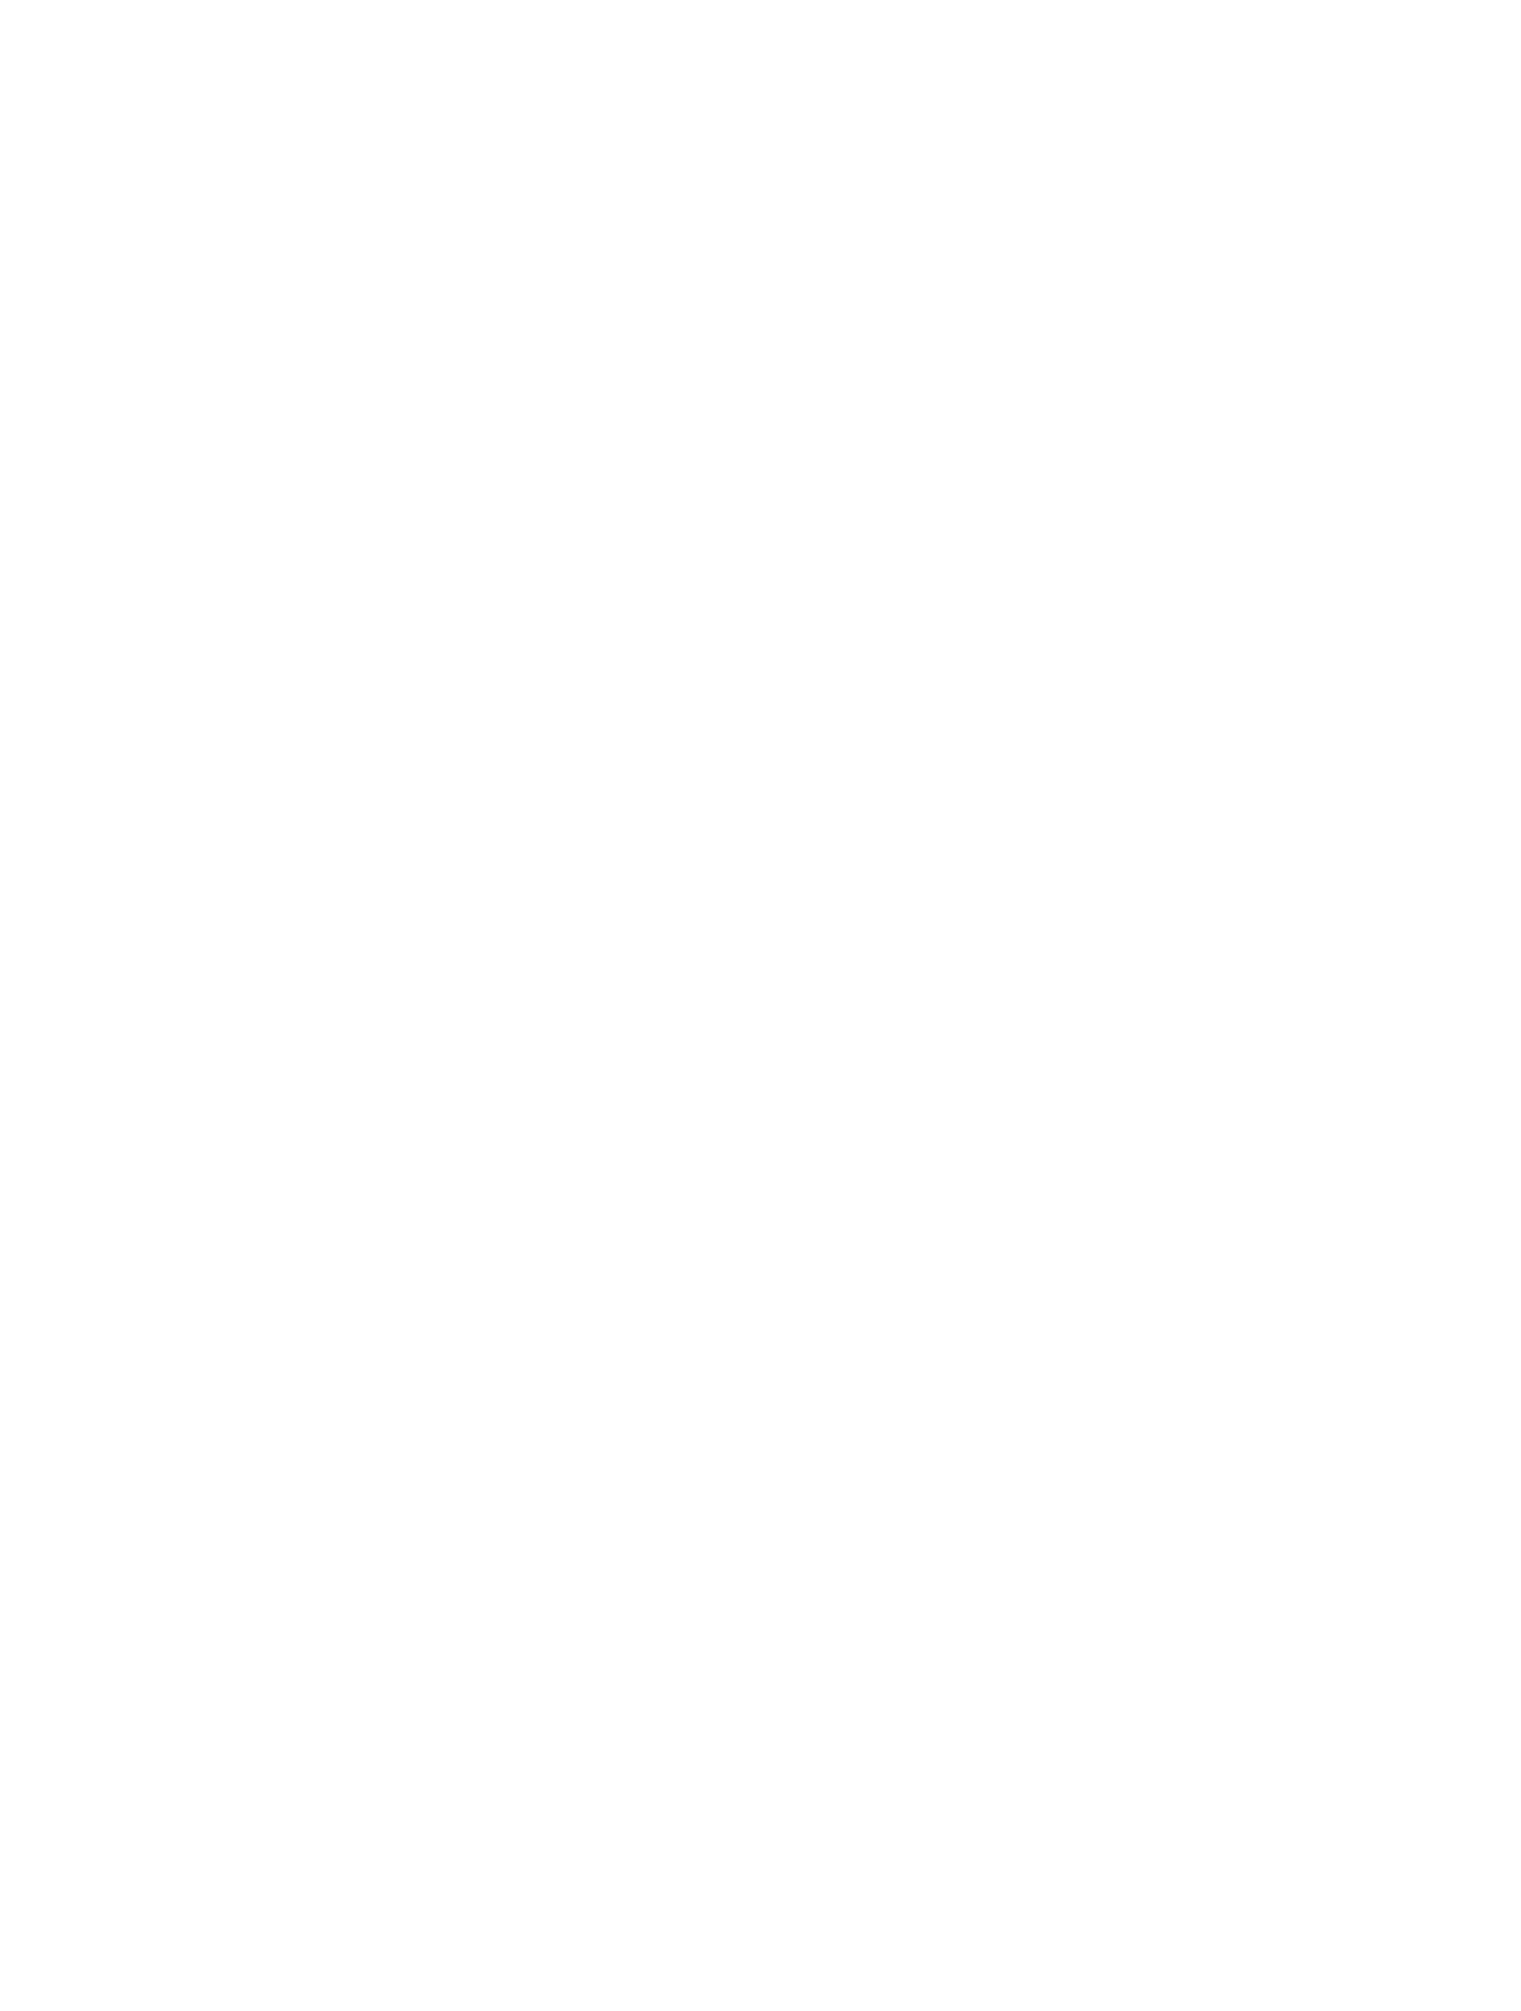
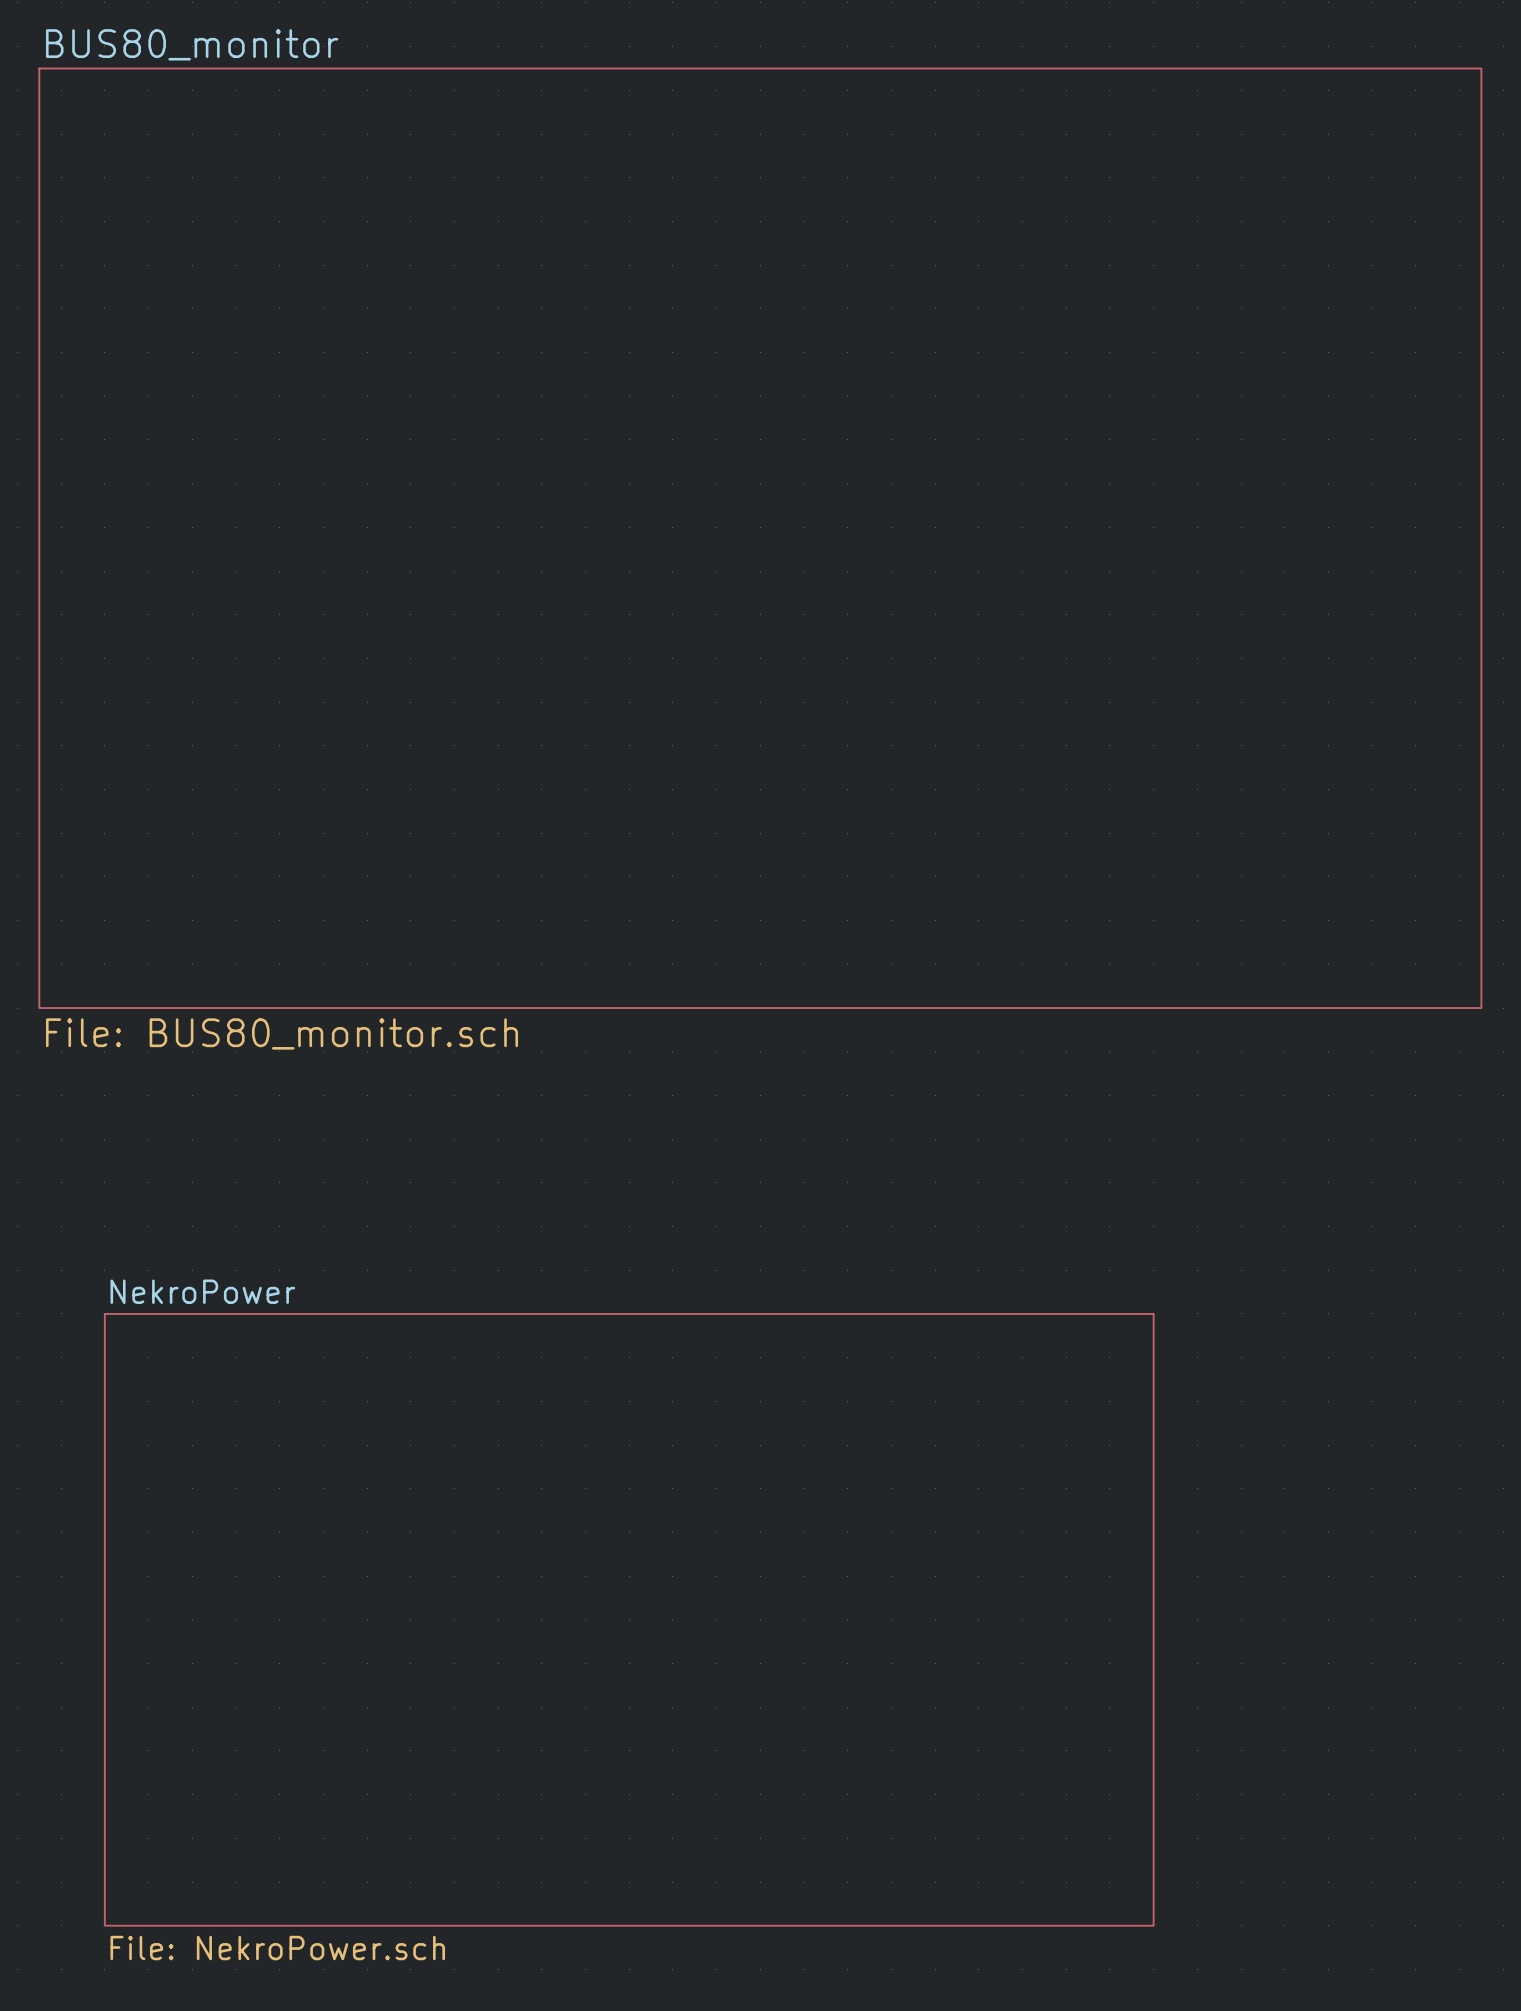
sheet BUS80_monitor: none -> File: BUS80_monitor.sch (760, 538)
sheet NekroPower: none -> File: NekroPower.sch (629, 1619)

